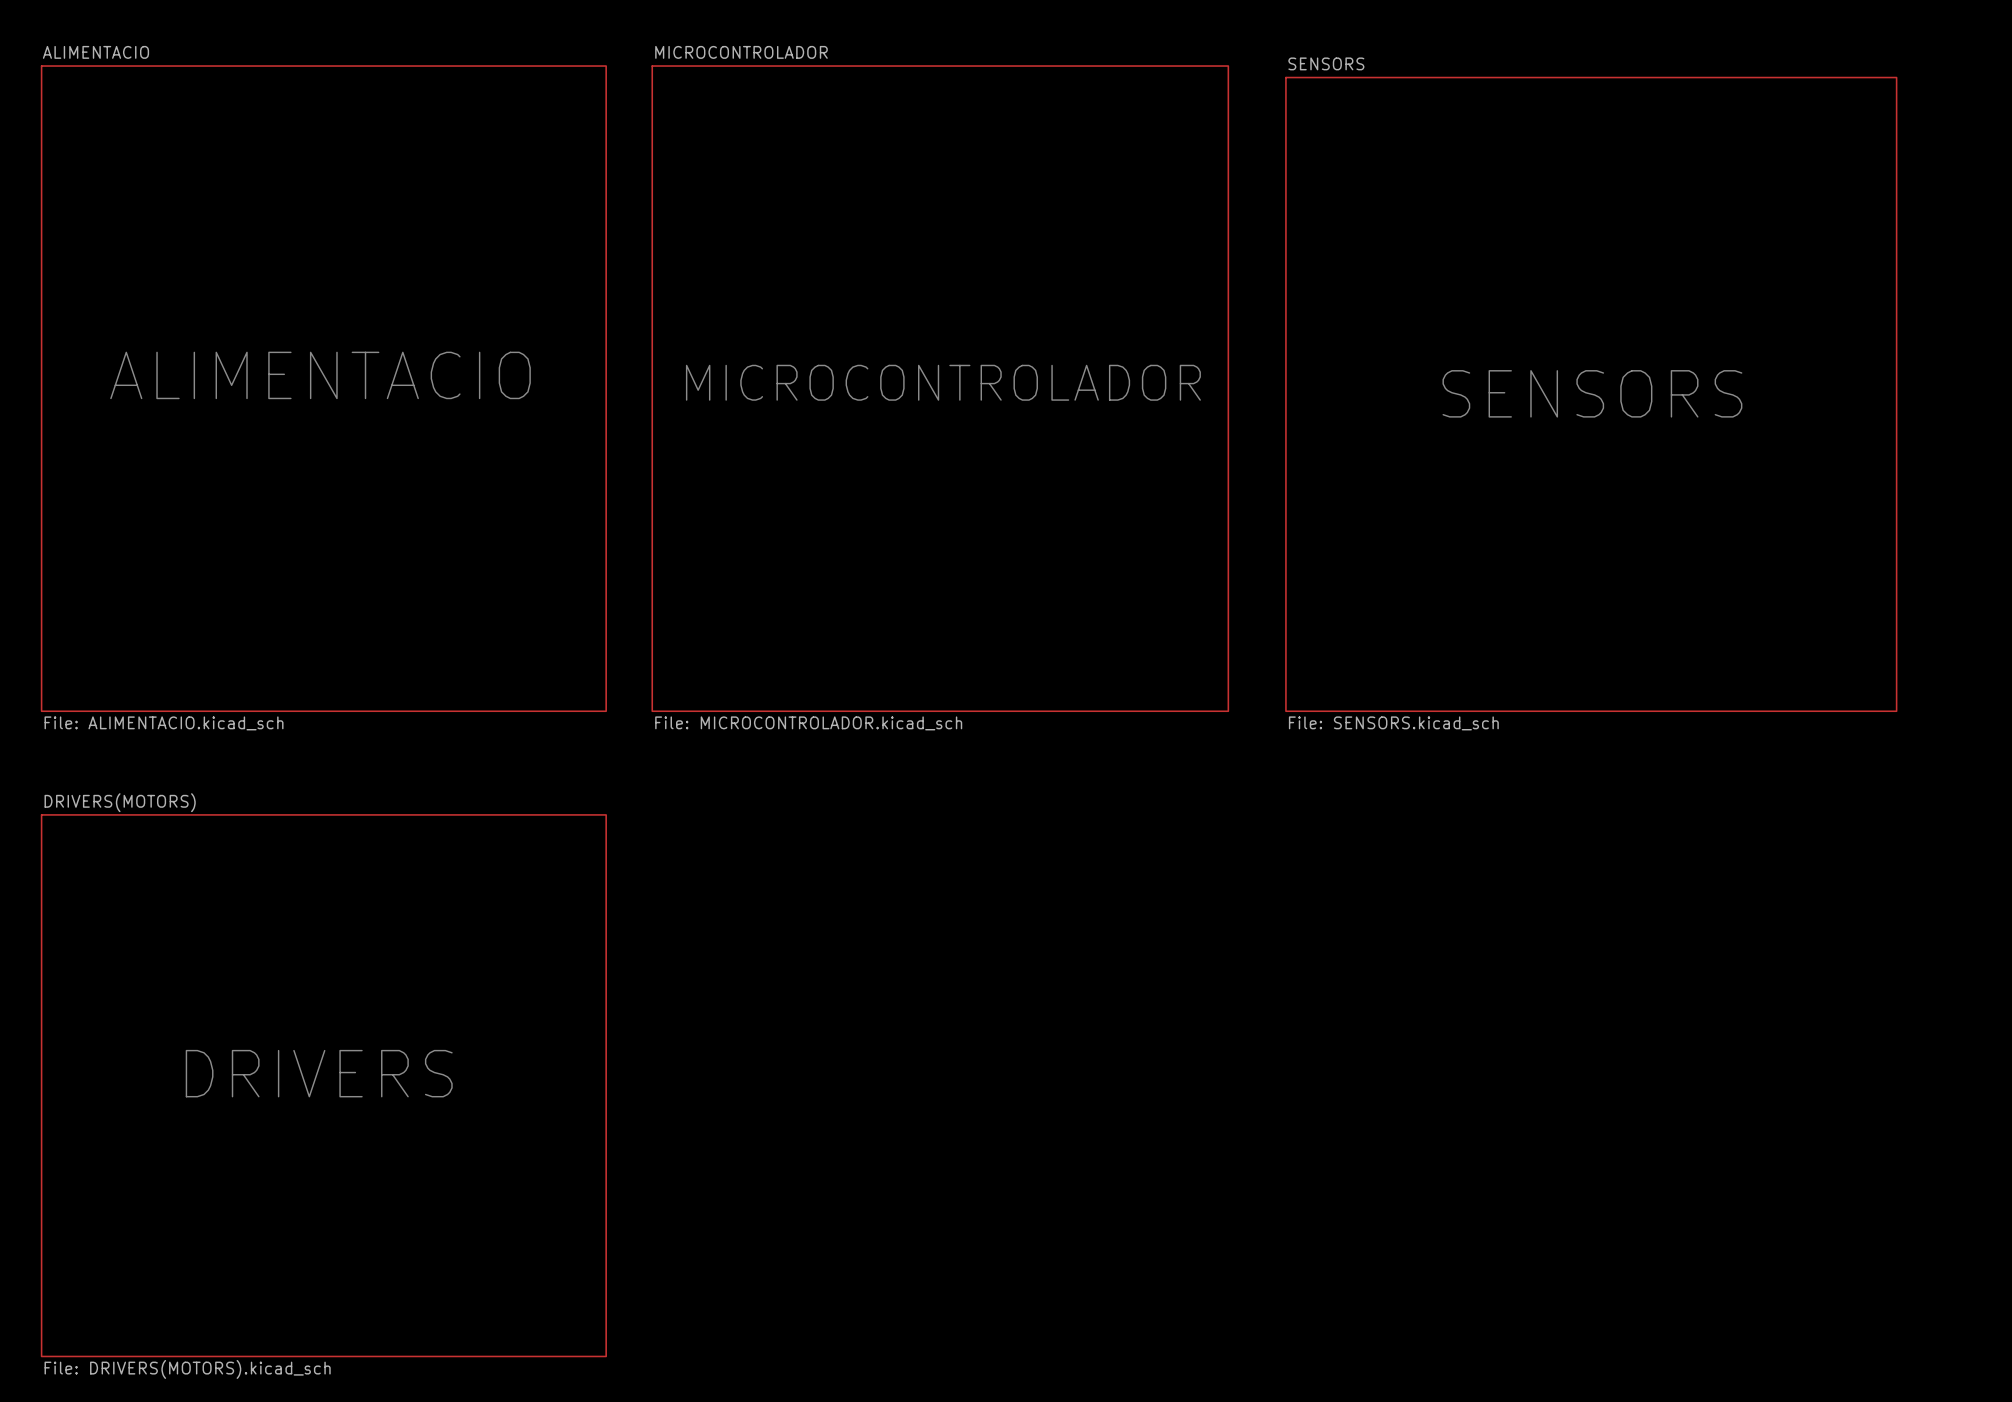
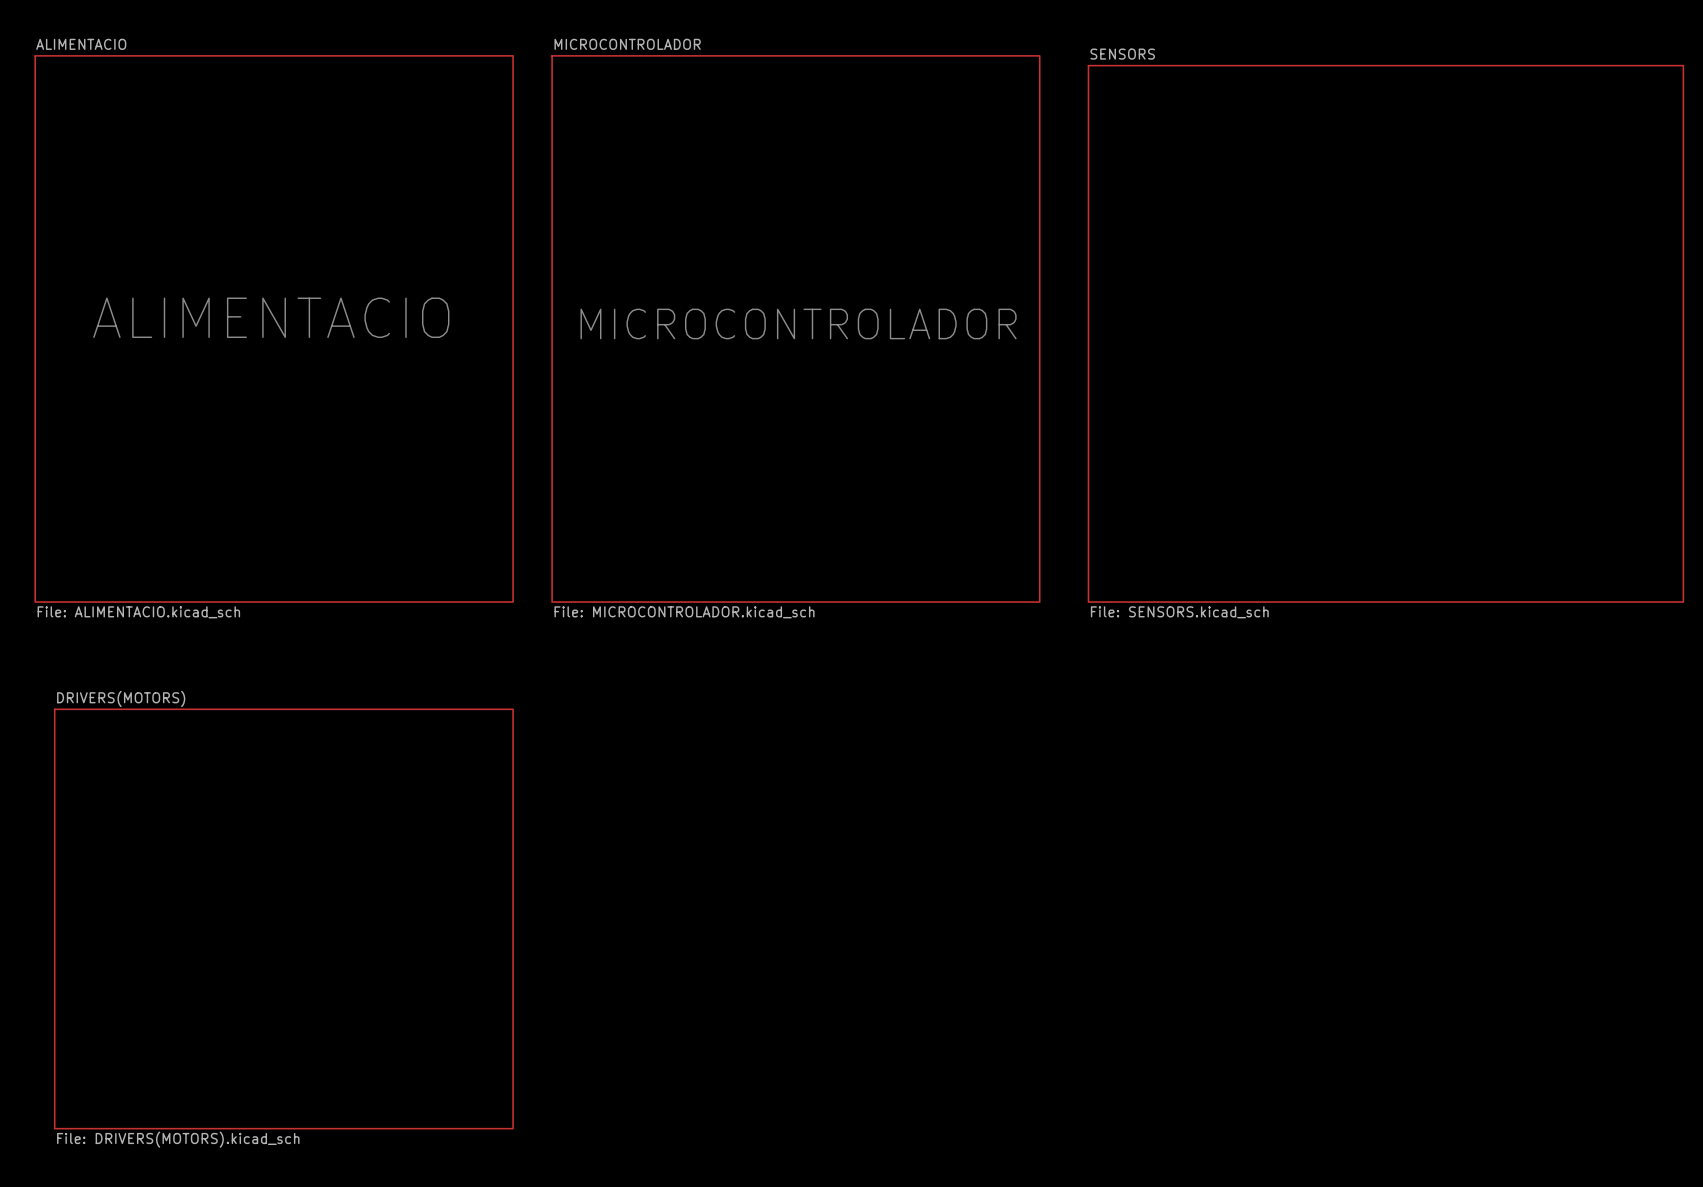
text: SENSORS (1592, 393) -> none
sheet SENSORS: File: SENSORS.kicad_sch (1591, 394) -> none
sheet SENSORS: none -> File: SENSORS.kicad_sch (1385, 333)
text: DRIVERS (319, 1073) -> none
sheet DRIVERS(MOTORS): File: DRIVERS(MOTORS).kicad_sch (323, 1085) -> none
sheet DRIVERS(MOTORS): none -> File: DRIVERS(MOTORS).kicad_sch (283, 918)

